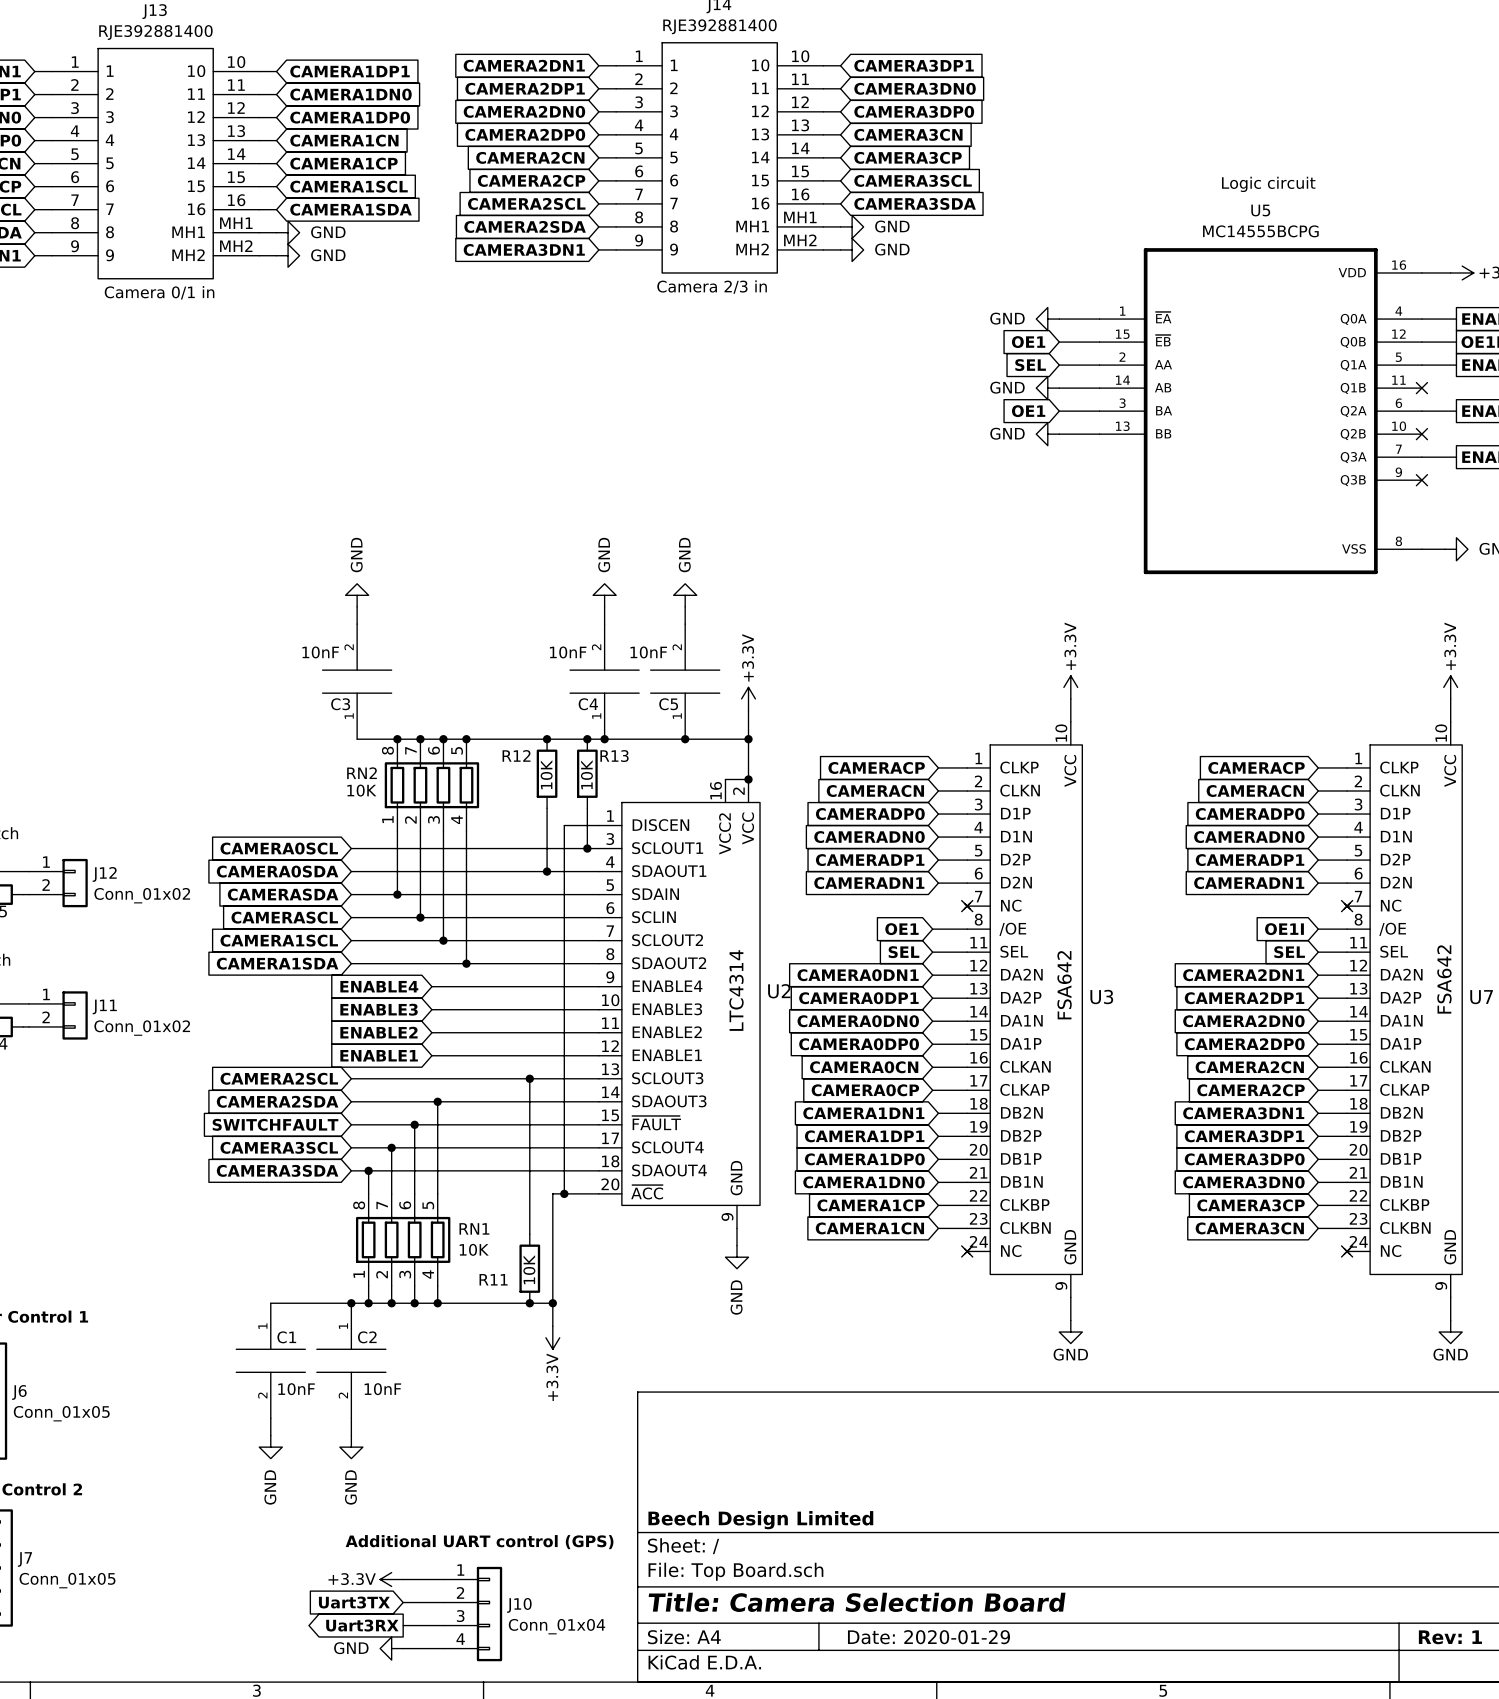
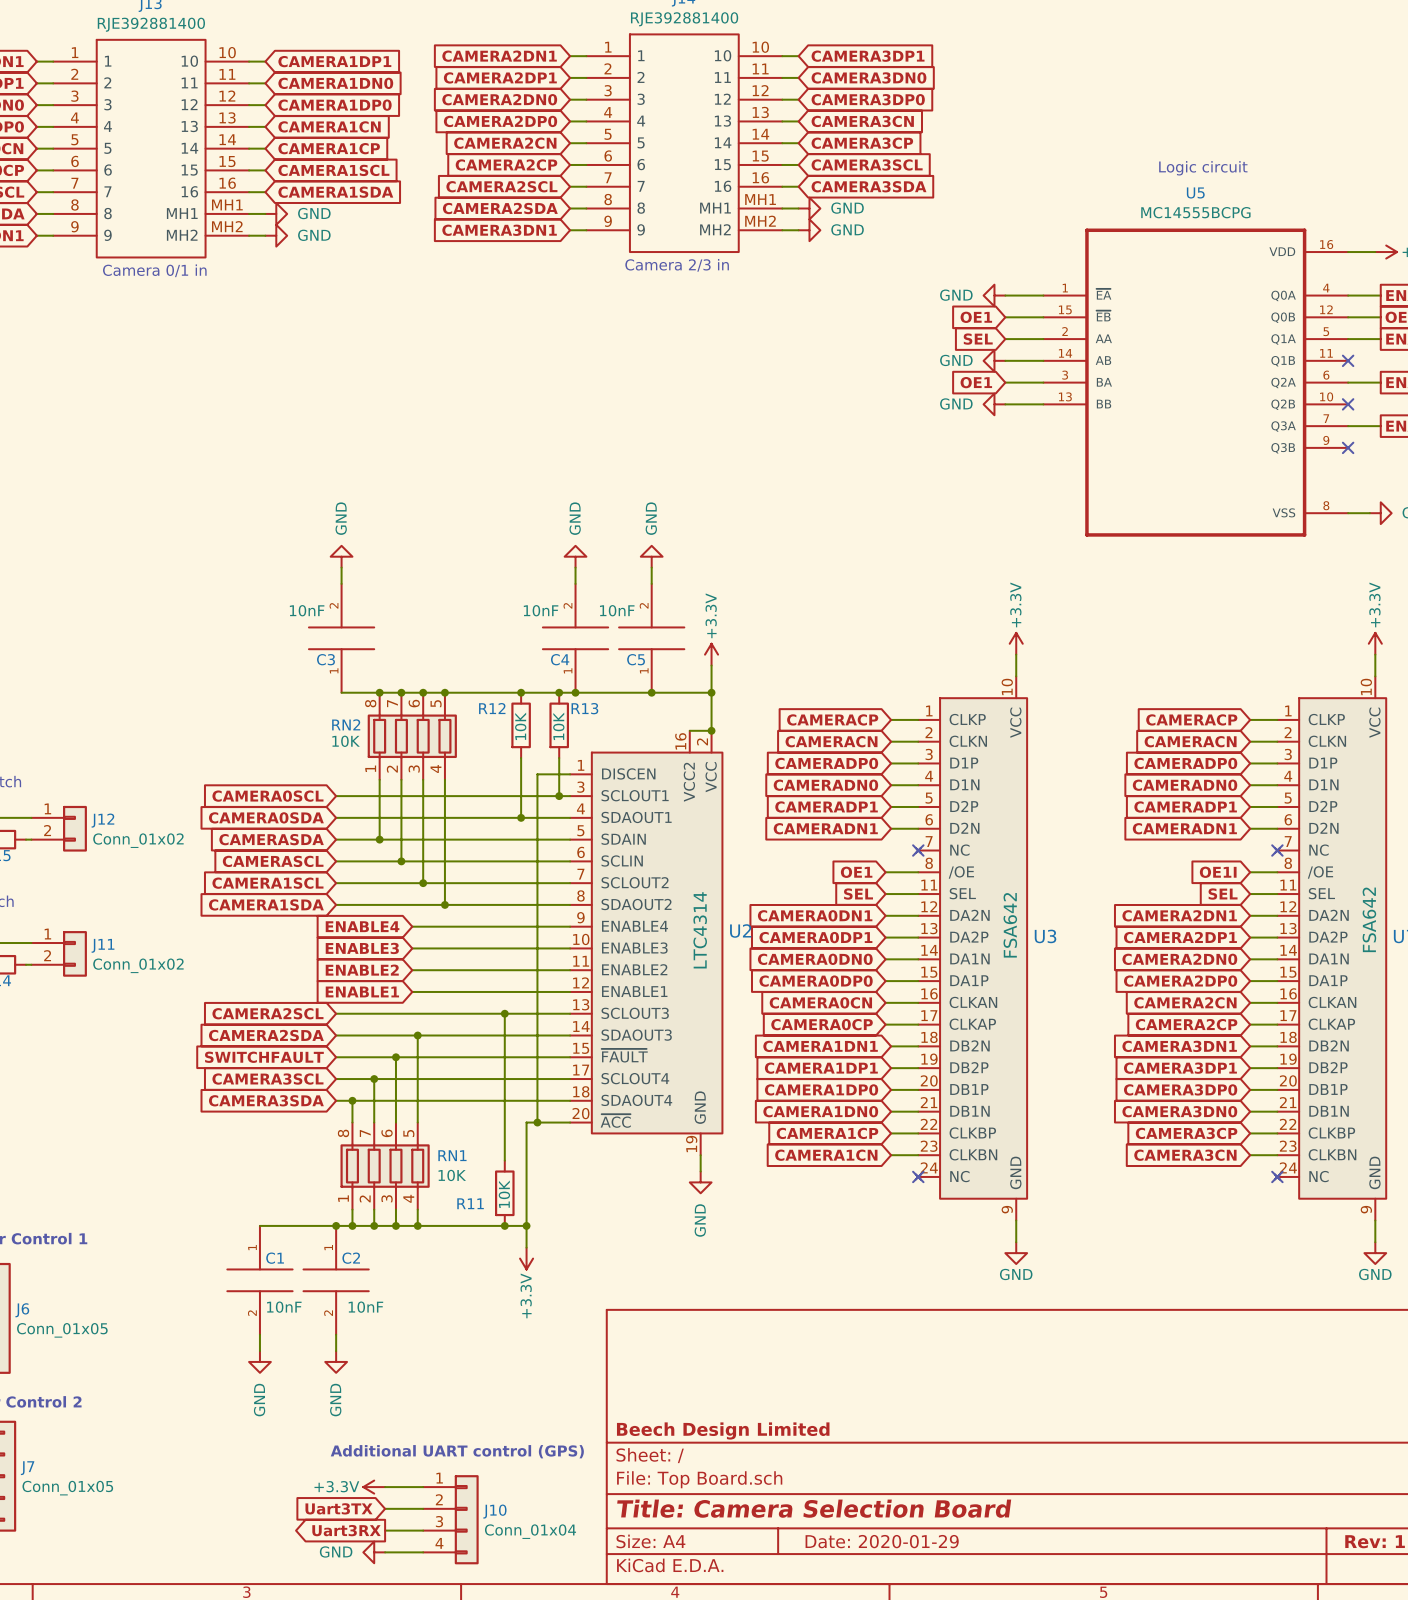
U2 pin number: 9 (727, 1216) -> 19 (691, 1144)

